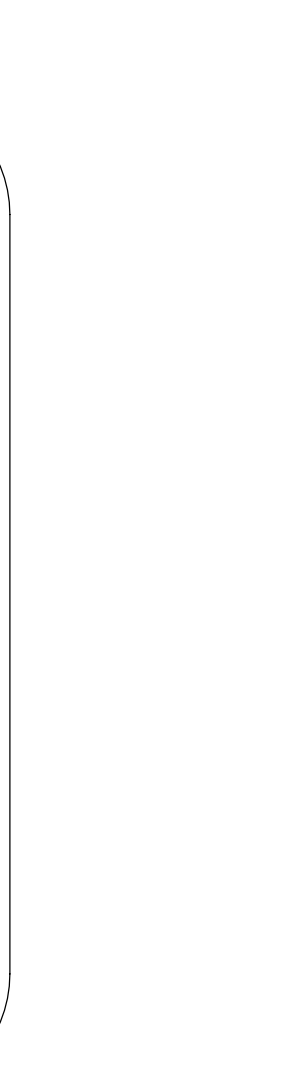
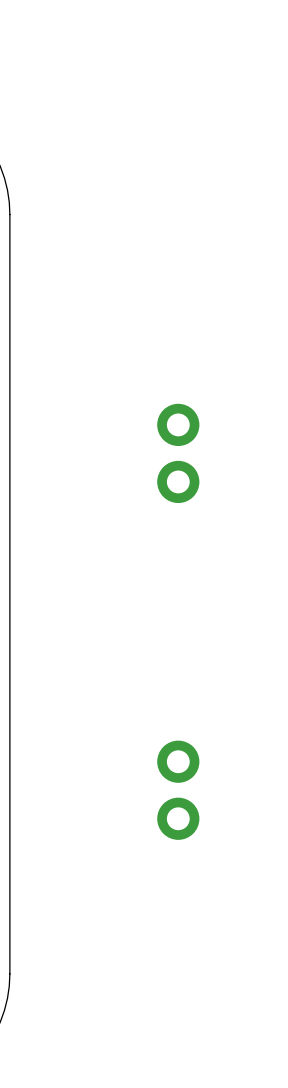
part: none -> (178, 453)
part: none -> (178, 790)

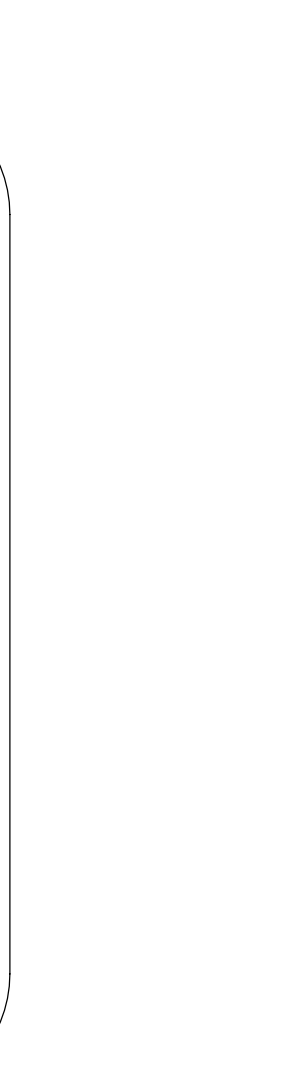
part: (178, 453) -> none
part: (178, 790) -> none

